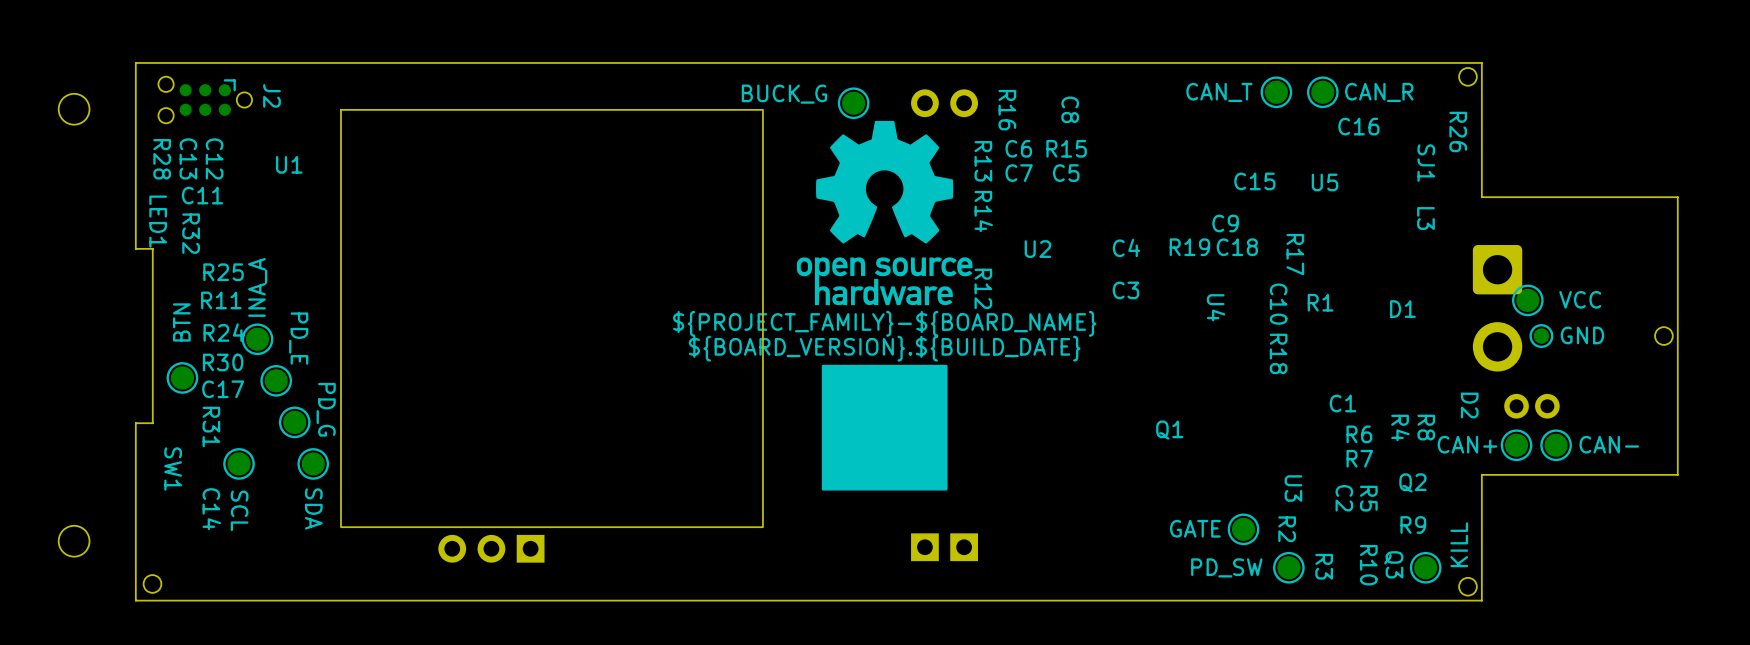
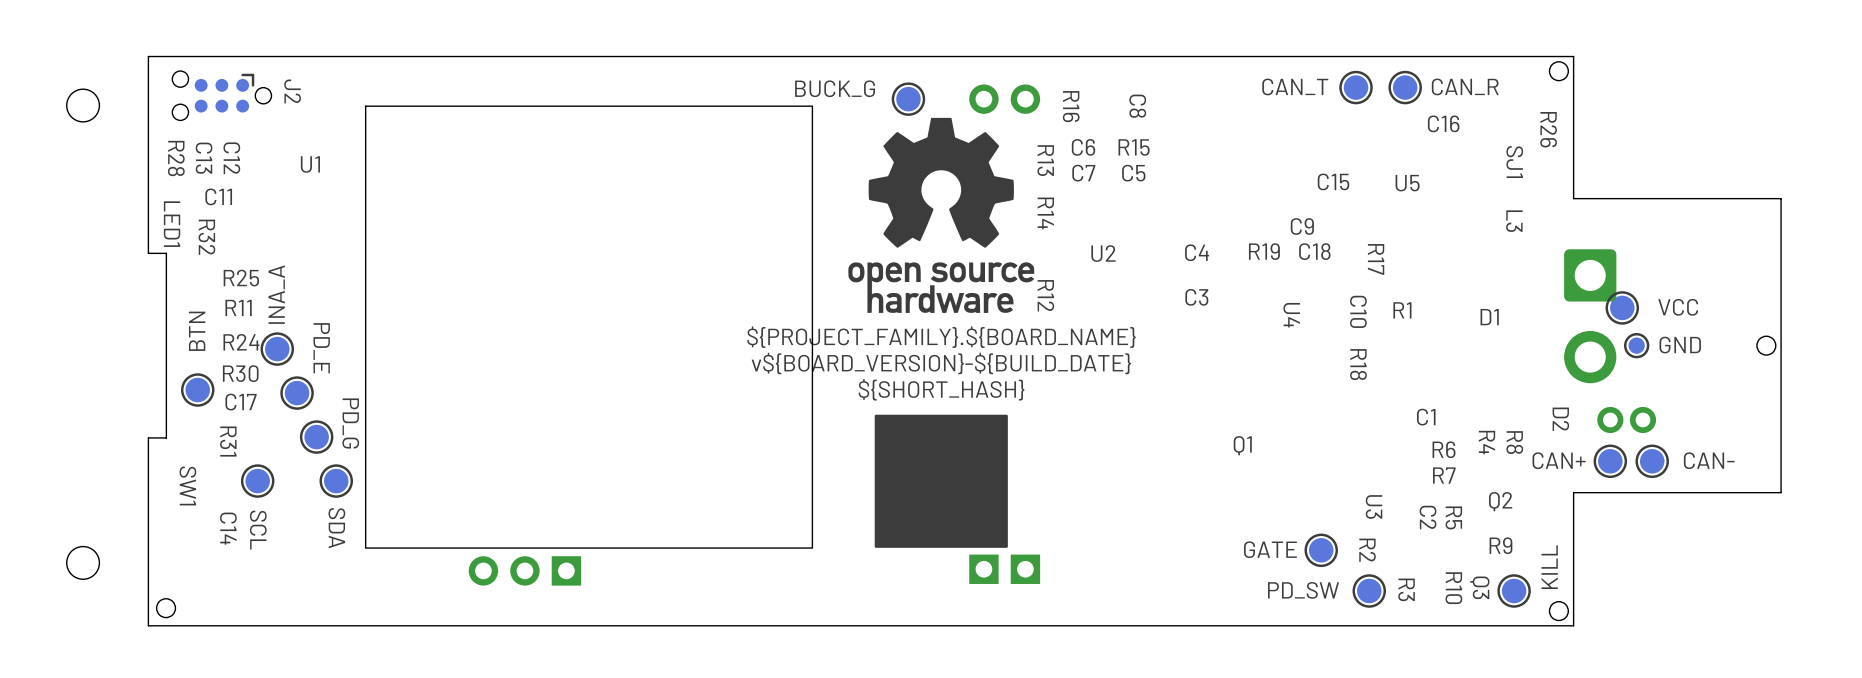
text: ${PROJECT_FAMILY}-${BOARD_NAME} (884, 323) -> ${PROJECT_FAMILY}.${BOARD_NAME} (941, 337)
text: ${BOARD_VERSION}.${BUILD_DATE} (884, 348) -> v${BOARD_VERSION}-${BUILD_DATE} (941, 363)
text: none -> ${SHORT_HASH} (941, 389)
drawing position: (884, 427) -> (941, 481)

